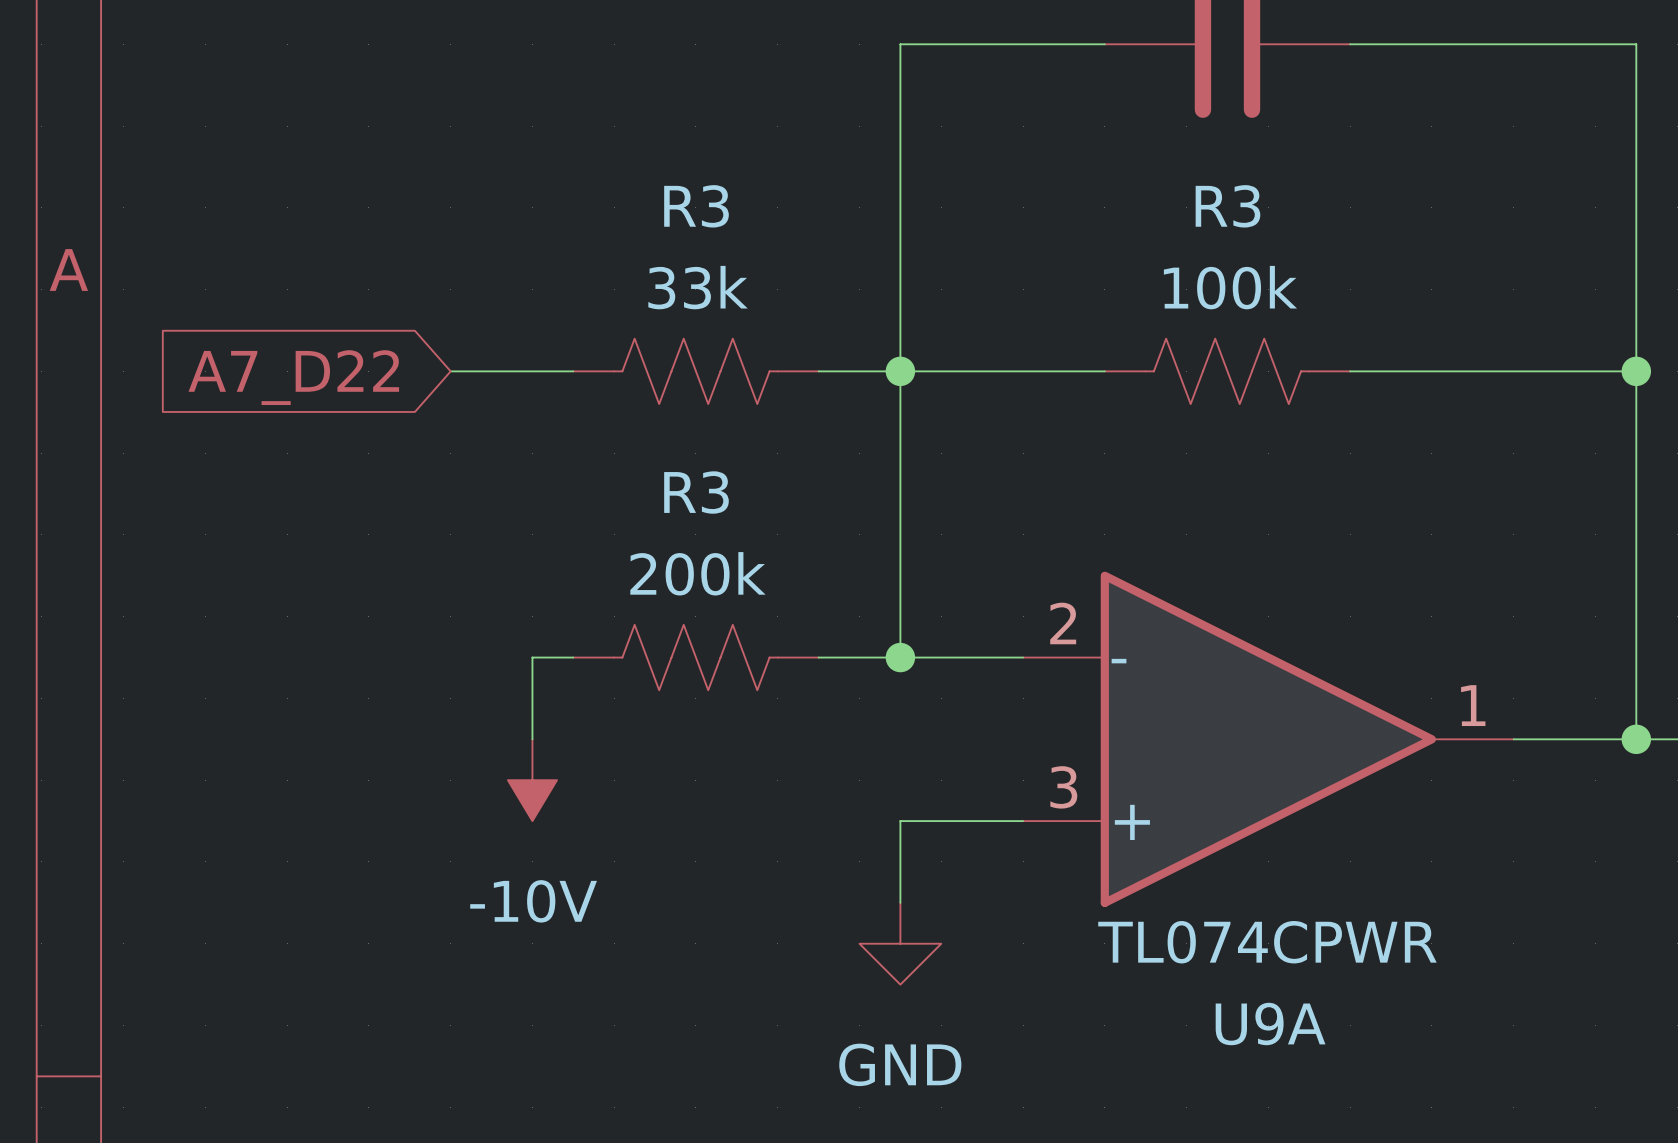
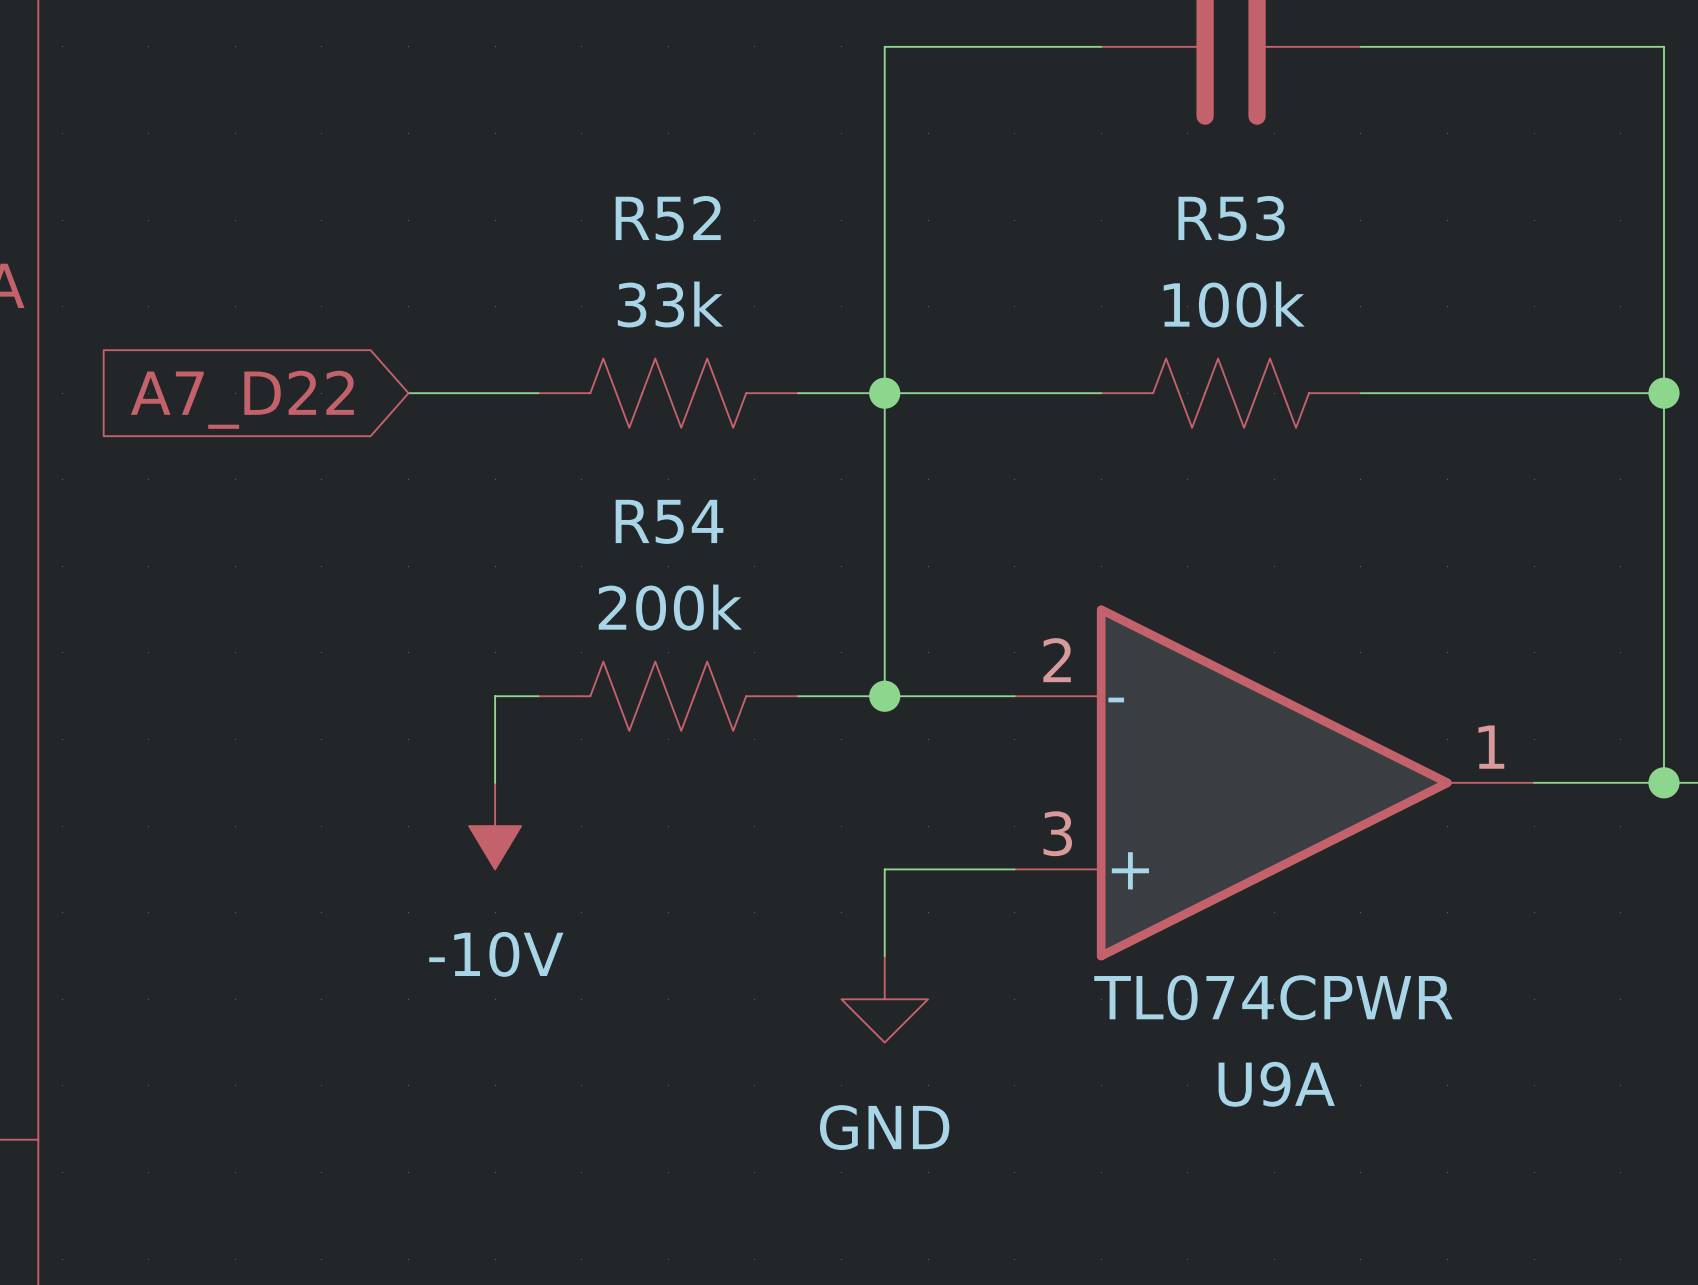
R3 name: R3 (696, 206) -> R52 (668, 218)
R3 name: R3 (1227, 206) -> R53 (1231, 218)
R3 name: R3 (696, 492) -> R54 (669, 521)

